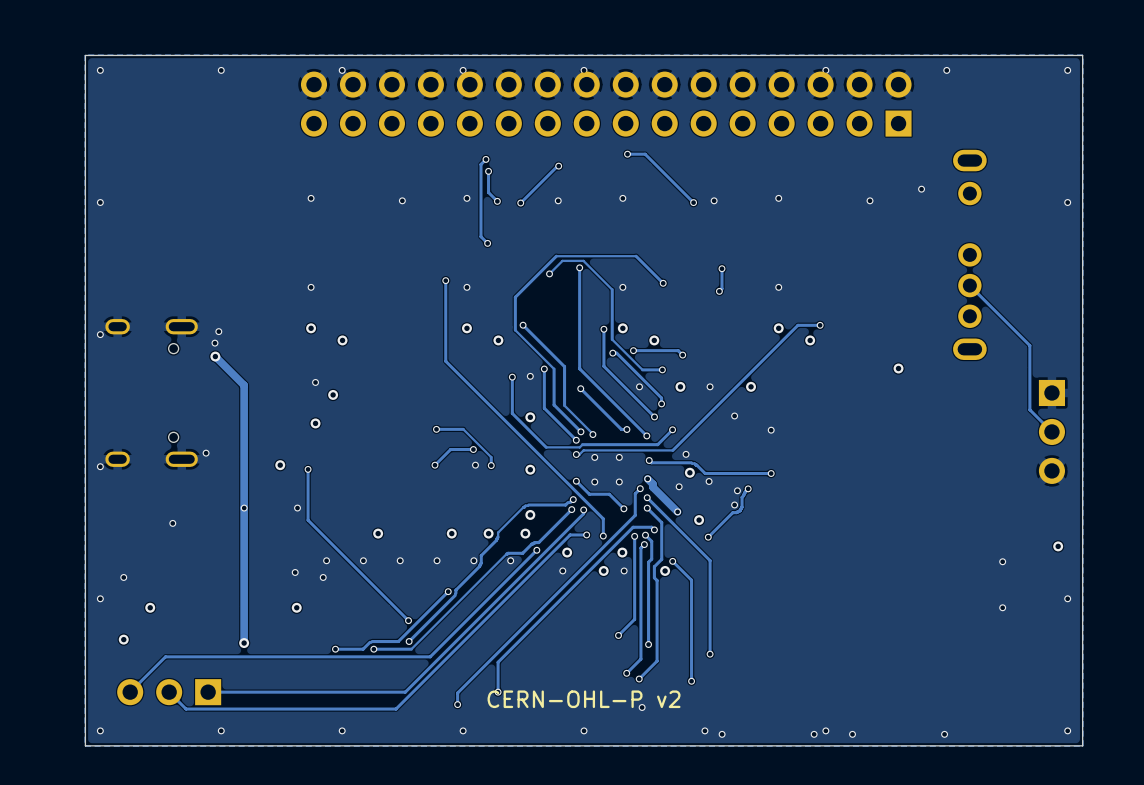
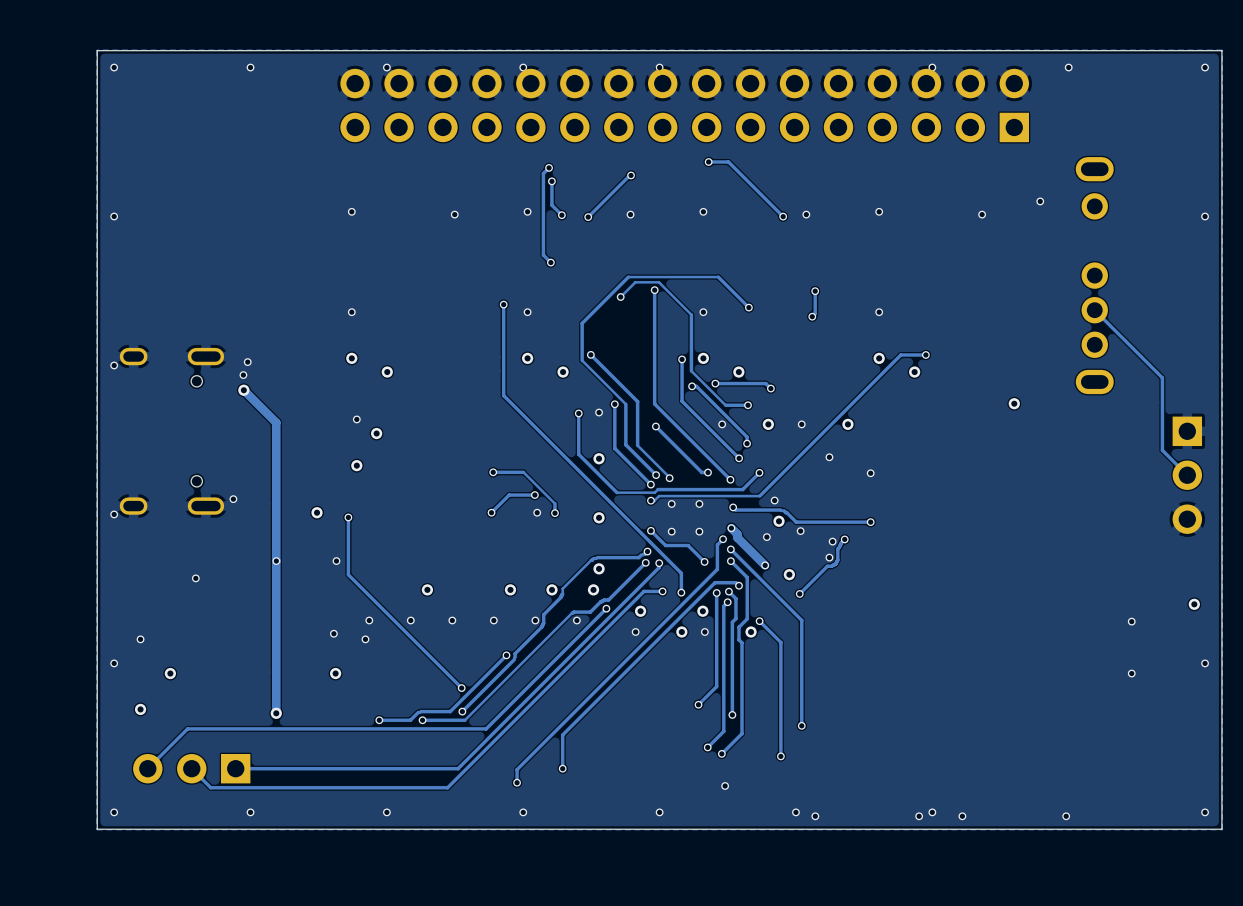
text: CERN-OHL-P v2 (584, 699) -> none

